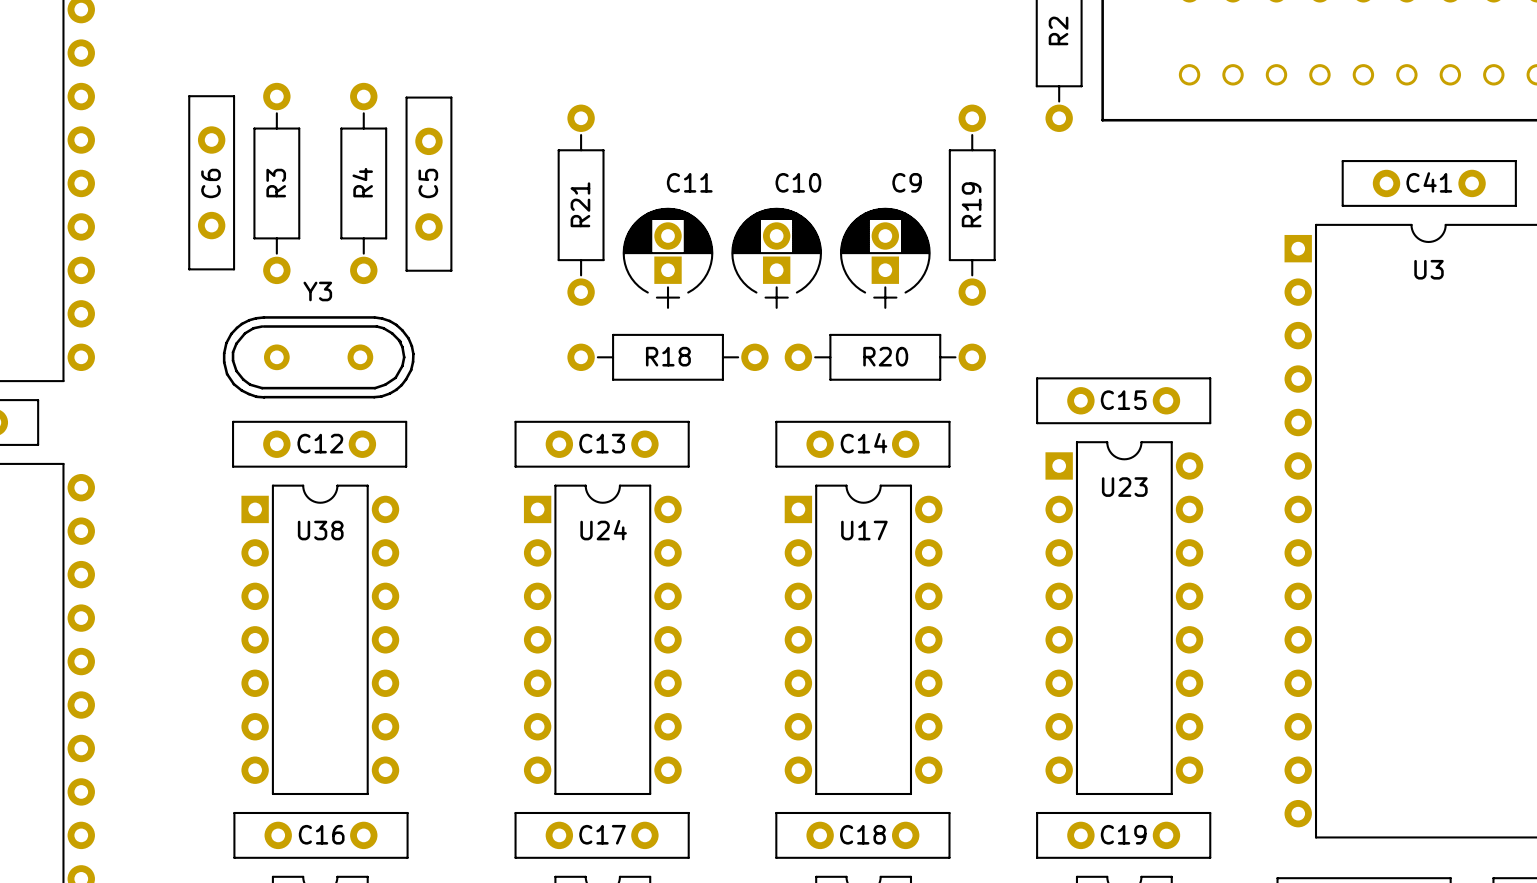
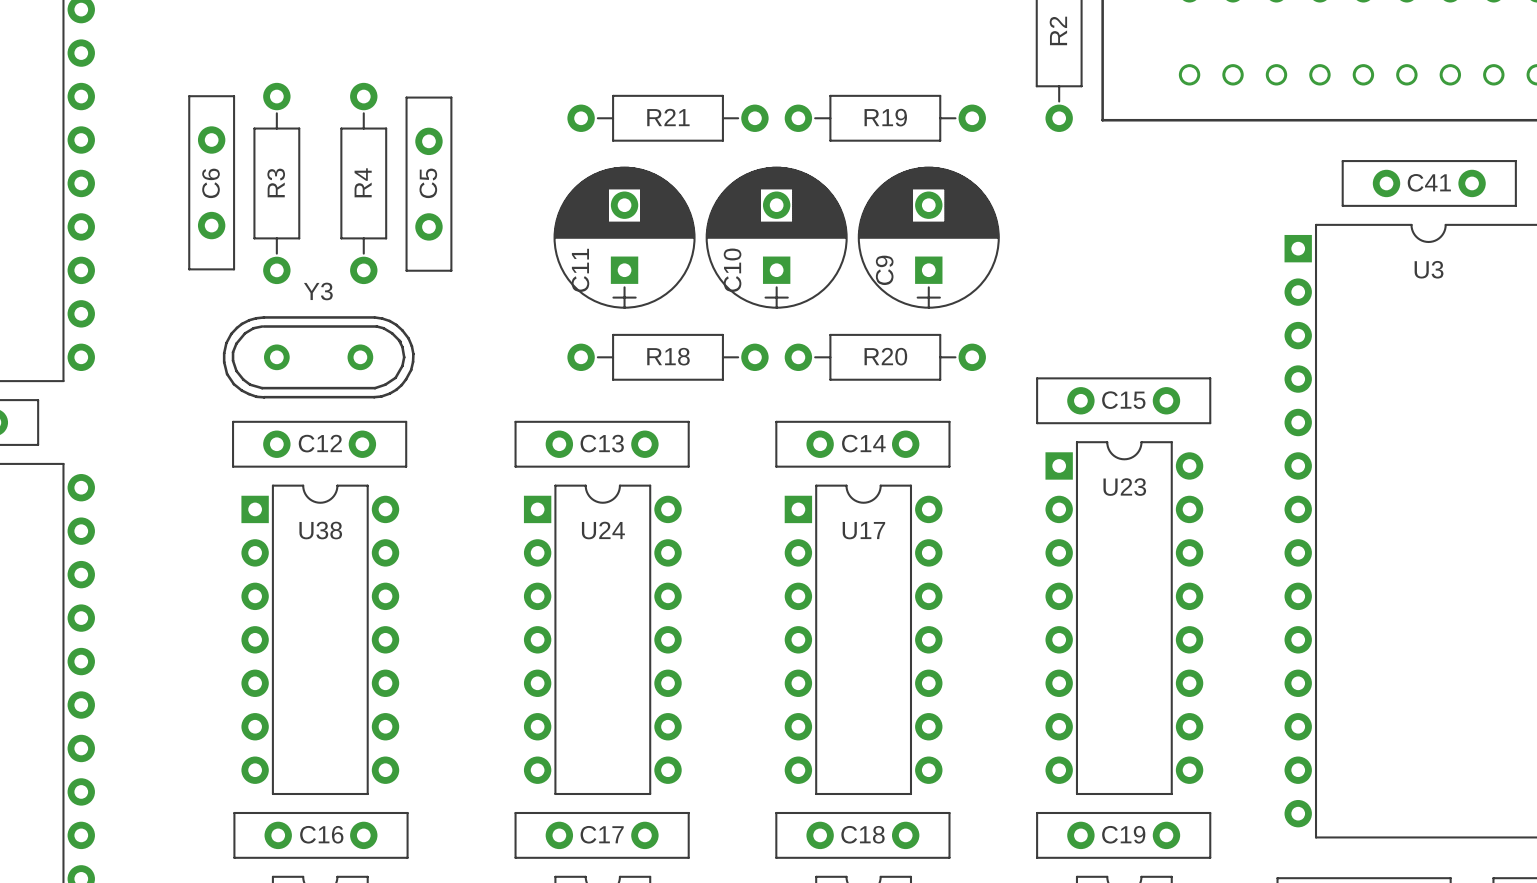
C11 name position: C11 (689, 182) -> C11 (580, 270)
C10 name position: C10 (798, 182) -> C10 (732, 270)
C9 name position: C9 (907, 182) -> C9 (884, 270)
R21 rotation: 0° (581, 205) -> 90° clockwise (668, 118)
R21 position: (581, 205) -> (668, 118)
R19 rotation: 0° (972, 205) -> 90° clockwise (885, 118)
R19 position: (972, 205) -> (885, 118)
C11 footprint: [622, 207, 714, 309] -> [553, 166, 696, 309]
C10 footprint: [731, 207, 823, 309] -> [705, 166, 848, 309]
C9 footprint: [839, 207, 931, 309] -> [857, 166, 1000, 309]

